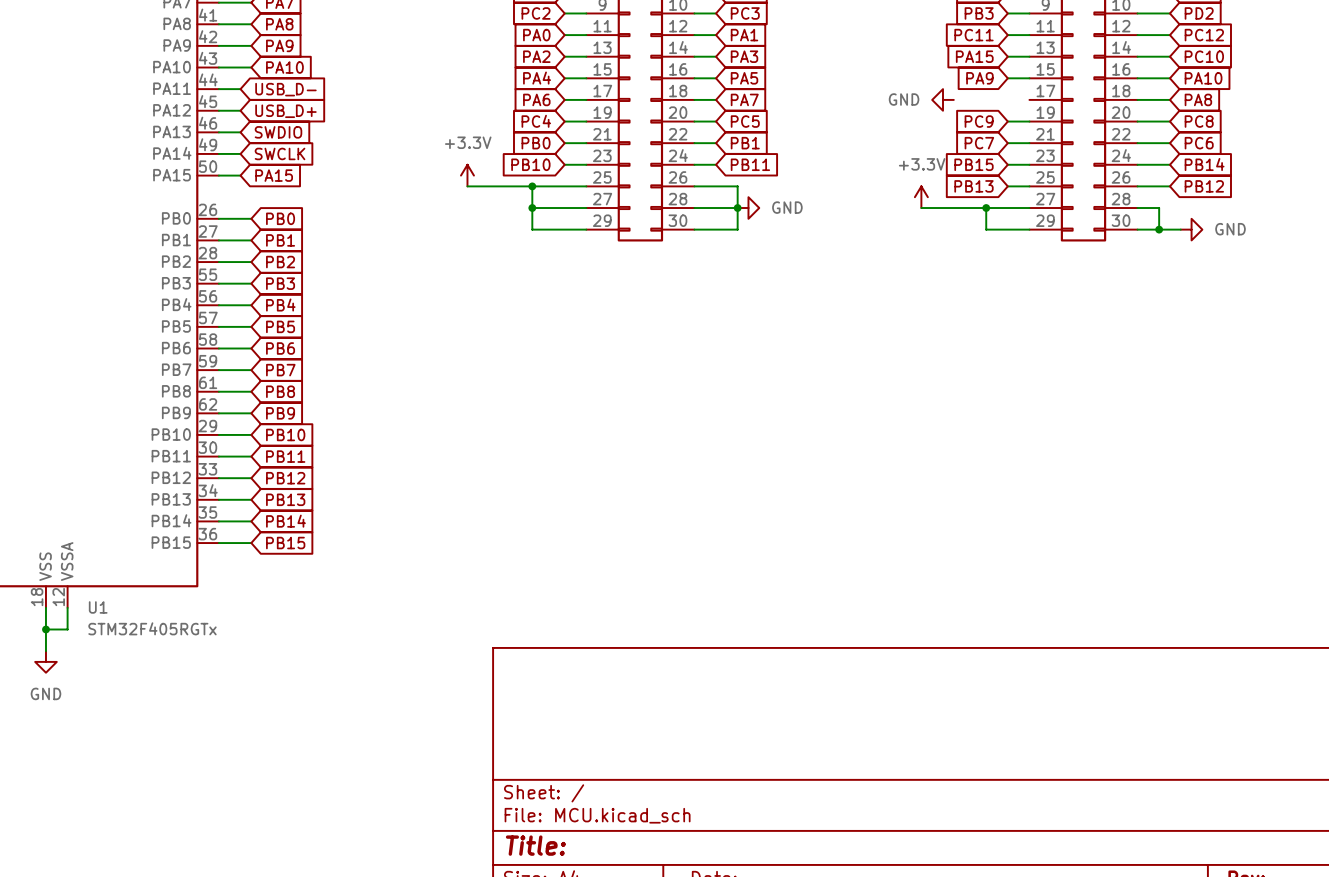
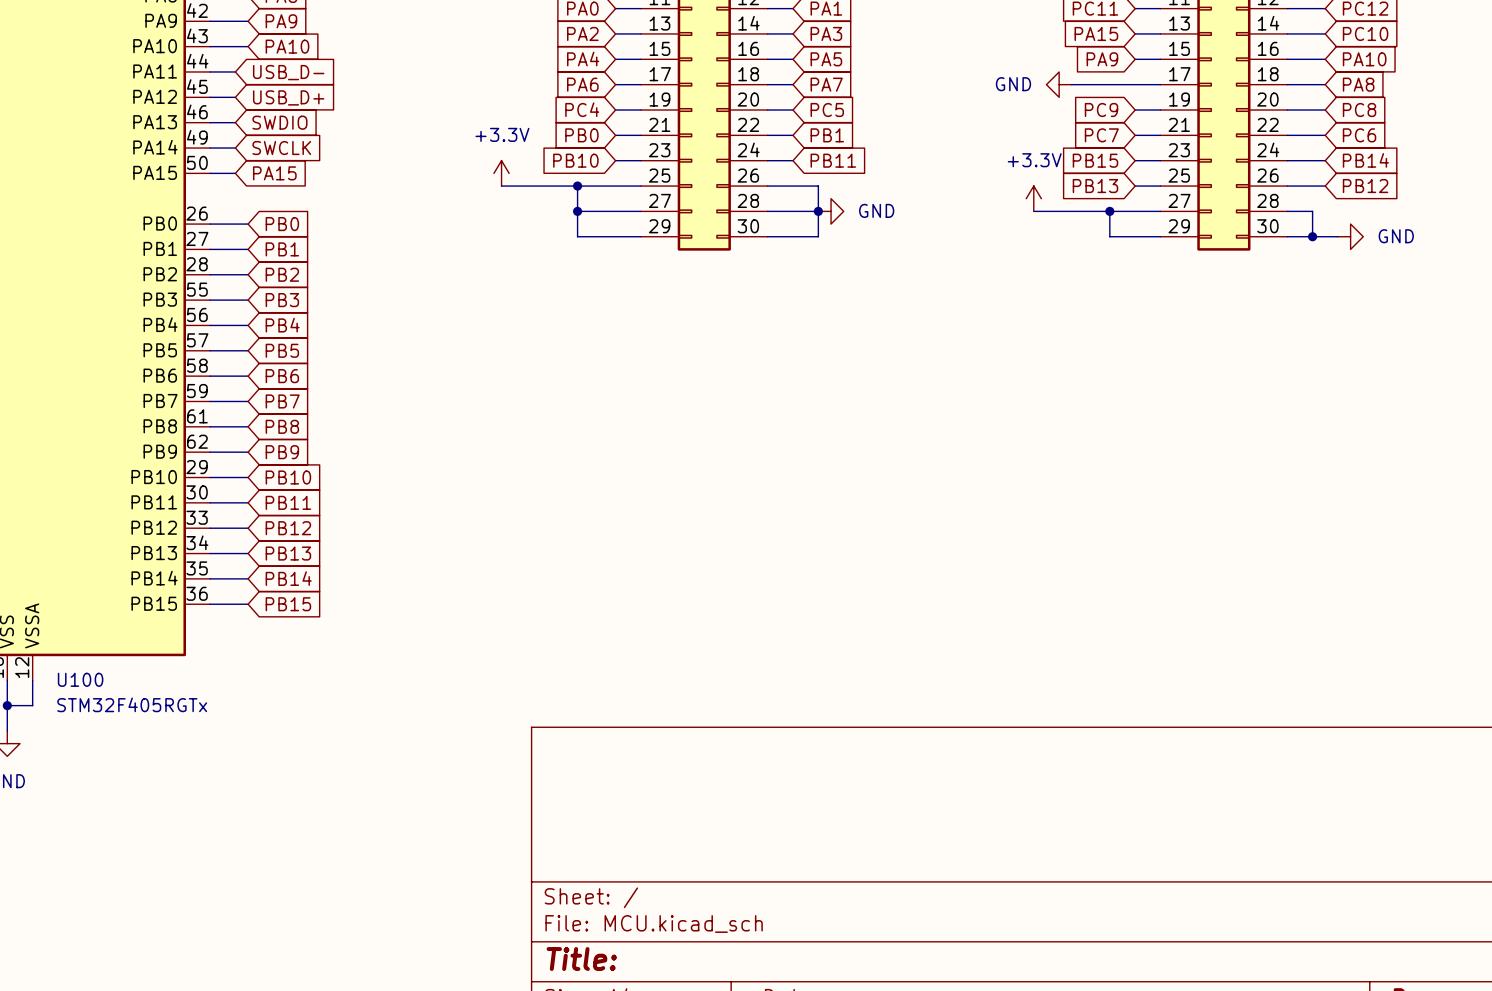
wire: none -> (1071, 84) (1160, 84)
U1 name: U1 (98, 607) -> U100 (80, 679)

